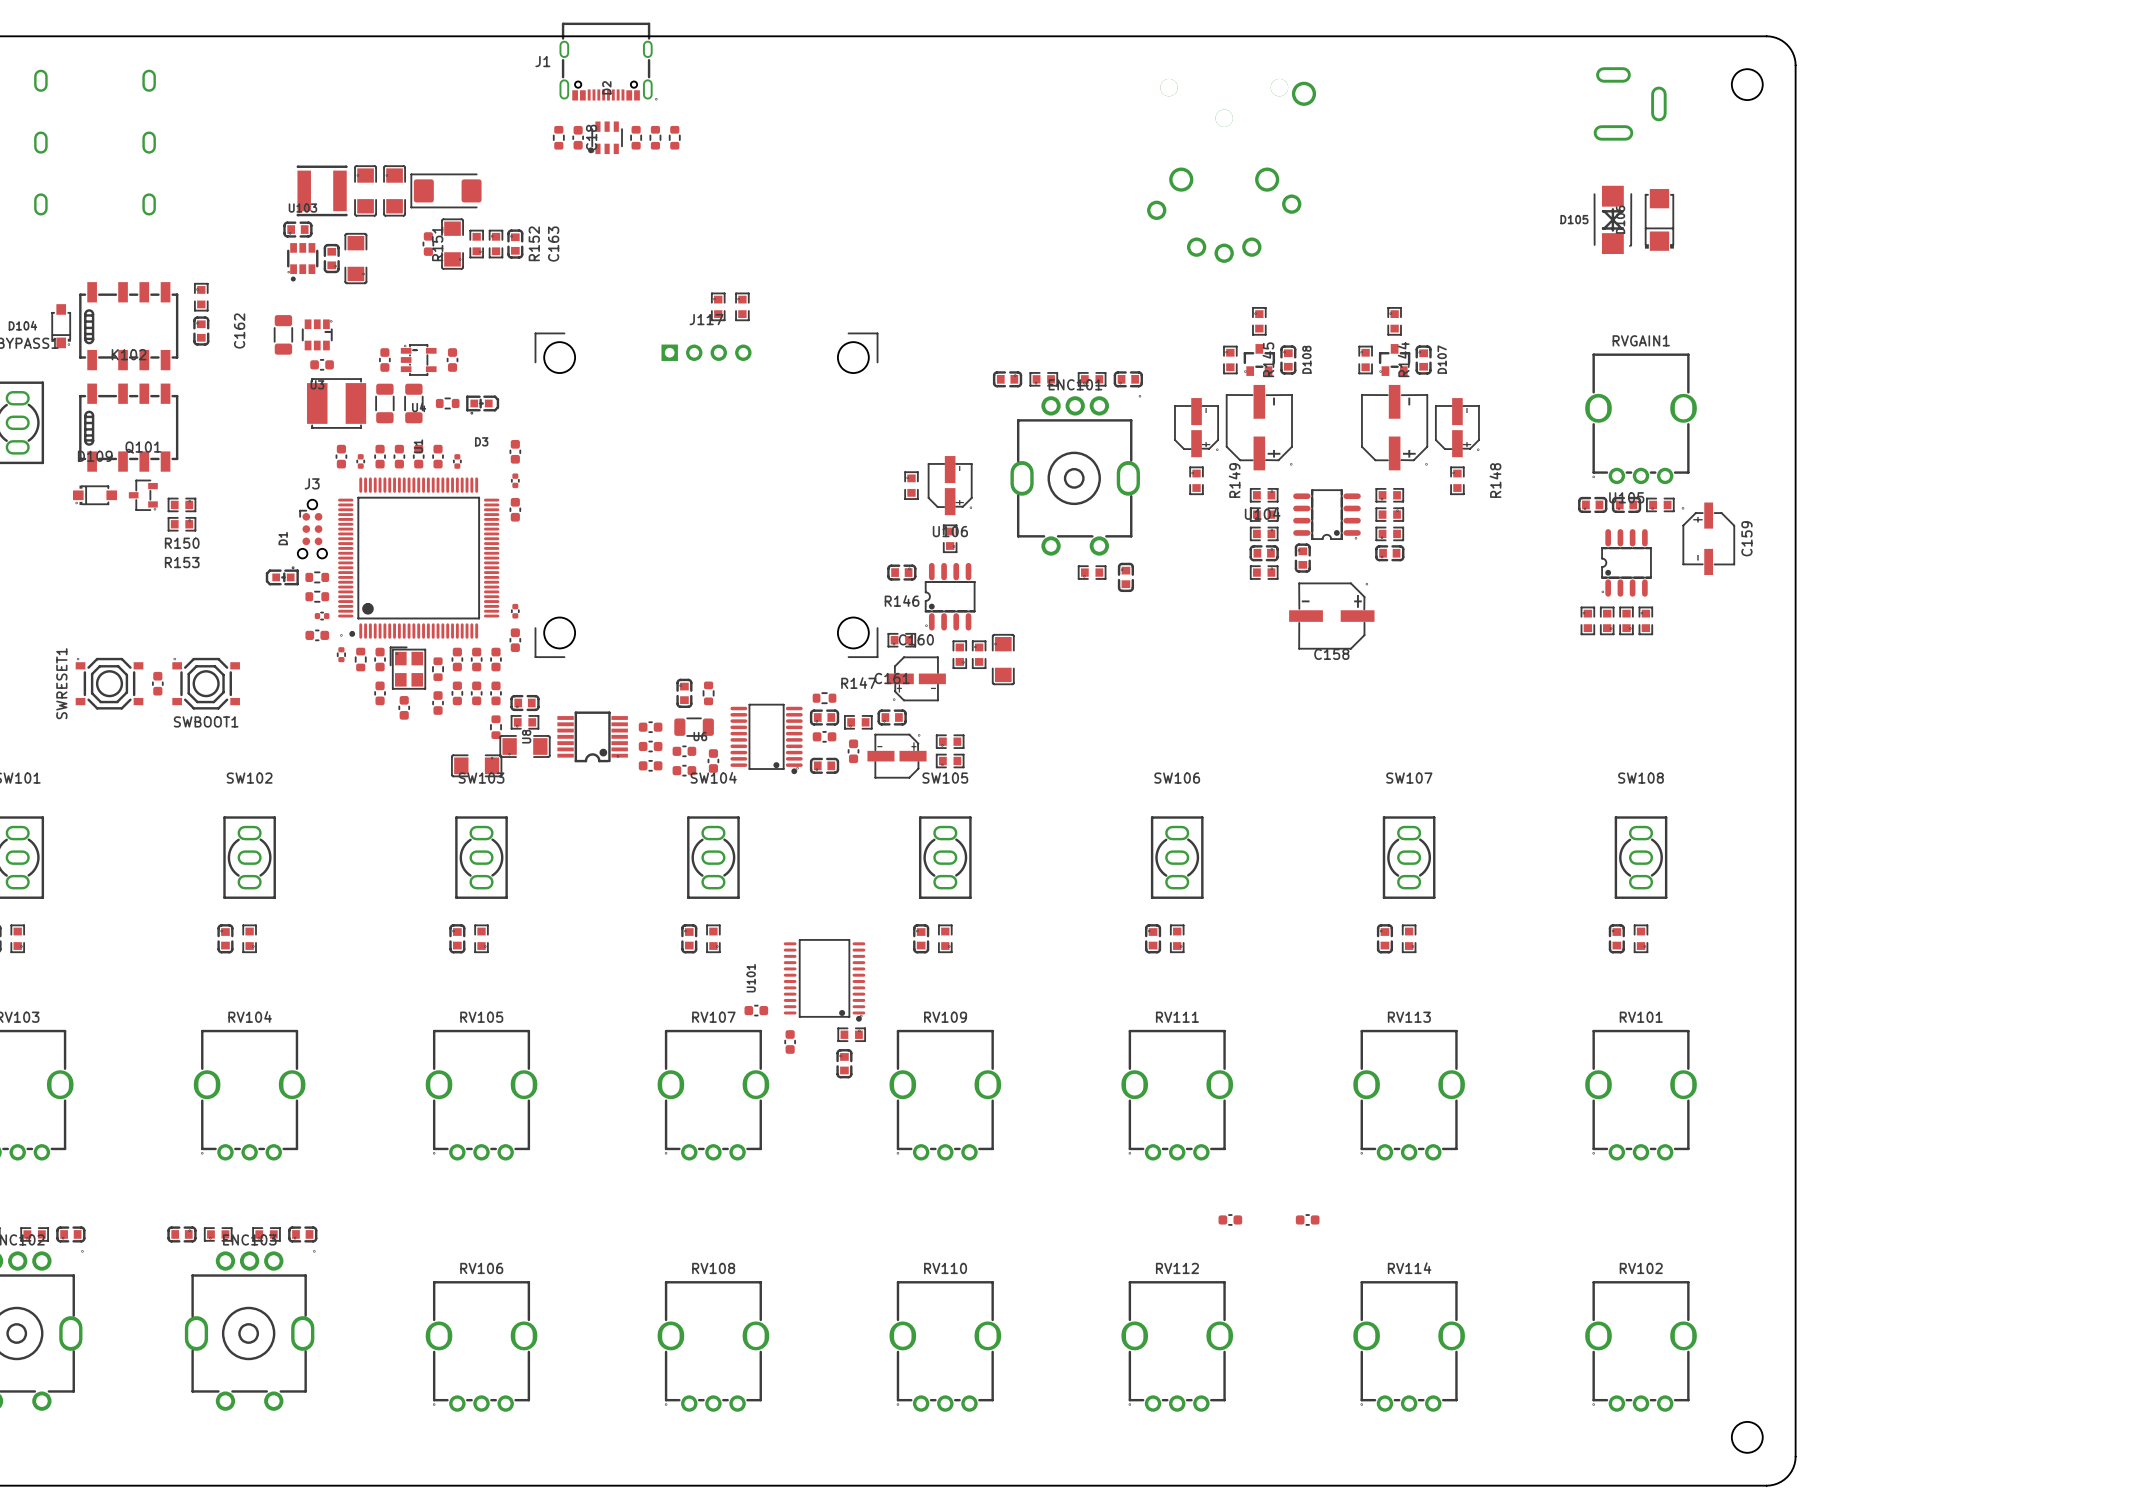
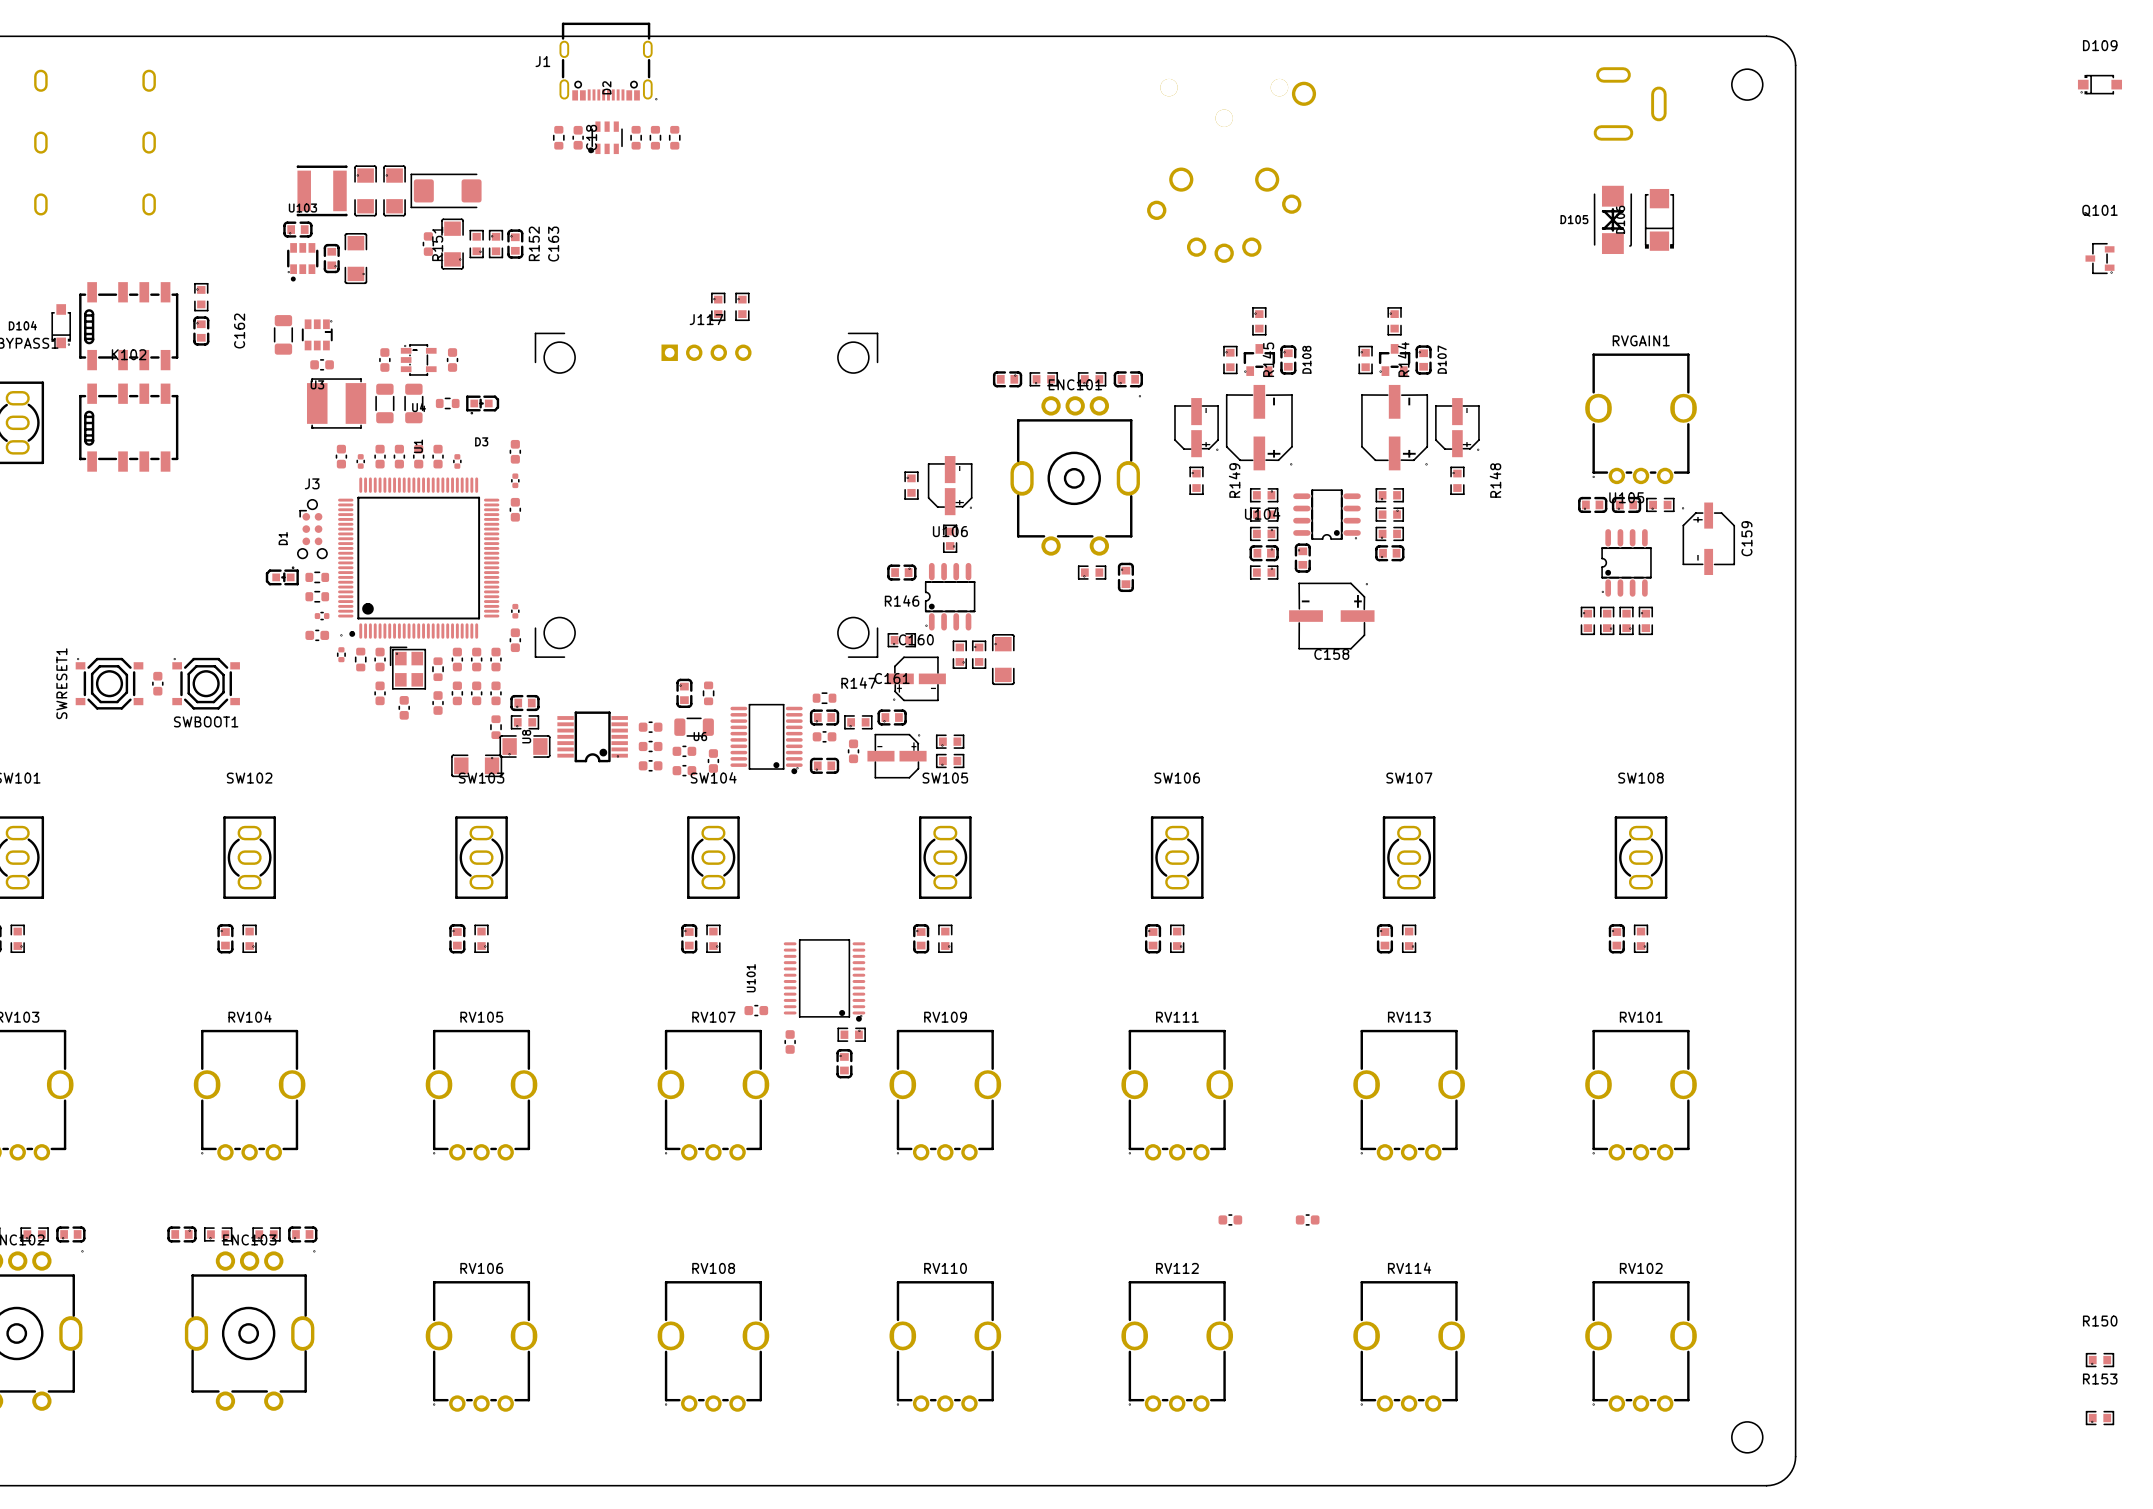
D109 position: (95, 495) -> (2099, 84)
Q101 position: (143, 495) -> (2099, 258)
R150 rotation: 0° (181, 504) -> 180° (2099, 1360)
R150 position: (181, 504) -> (2099, 1360)
R153 rotation: 0° (181, 524) -> 180° (2099, 1418)
R153 position: (181, 524) -> (2099, 1418)

